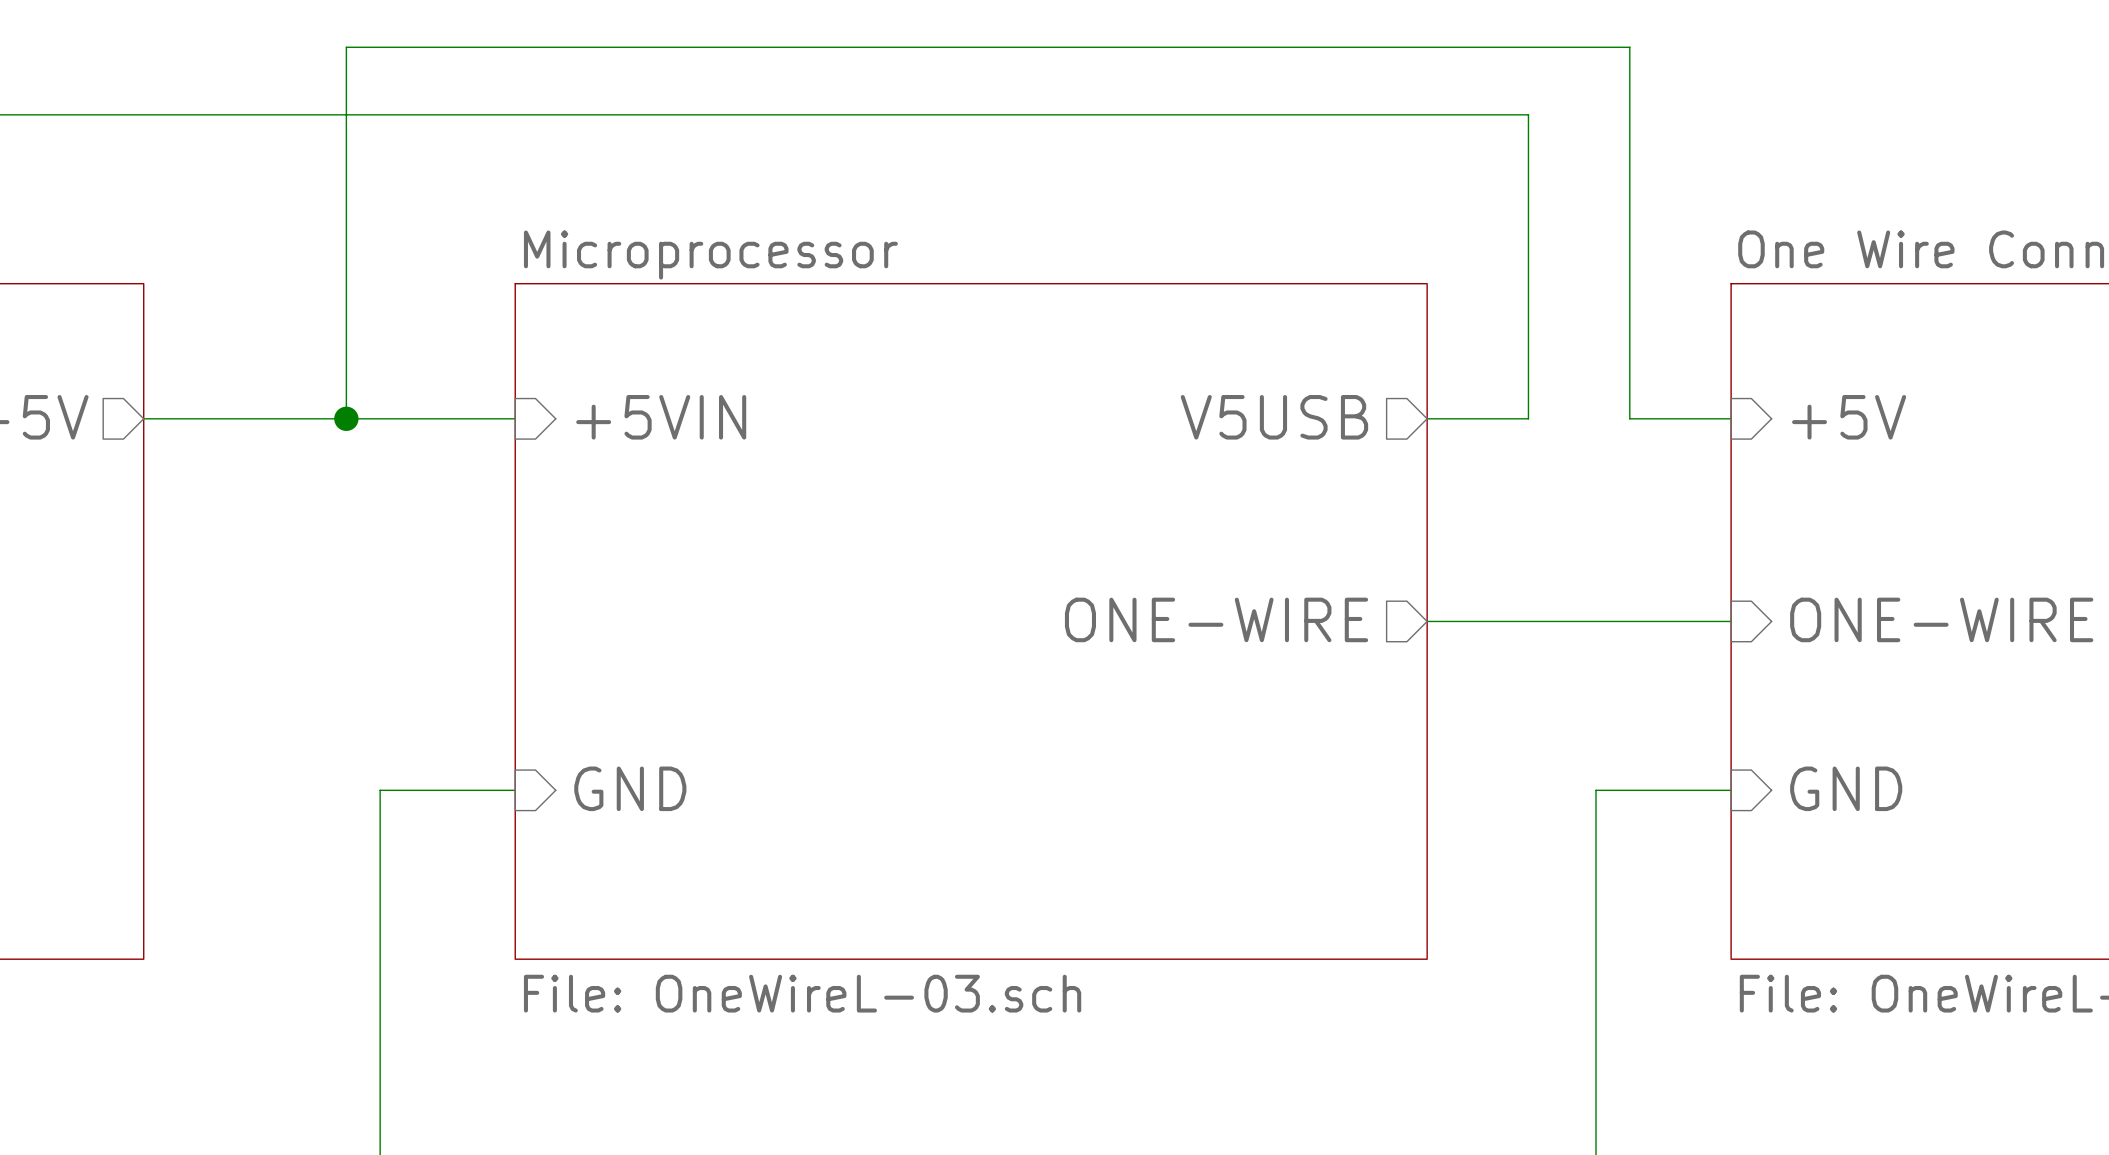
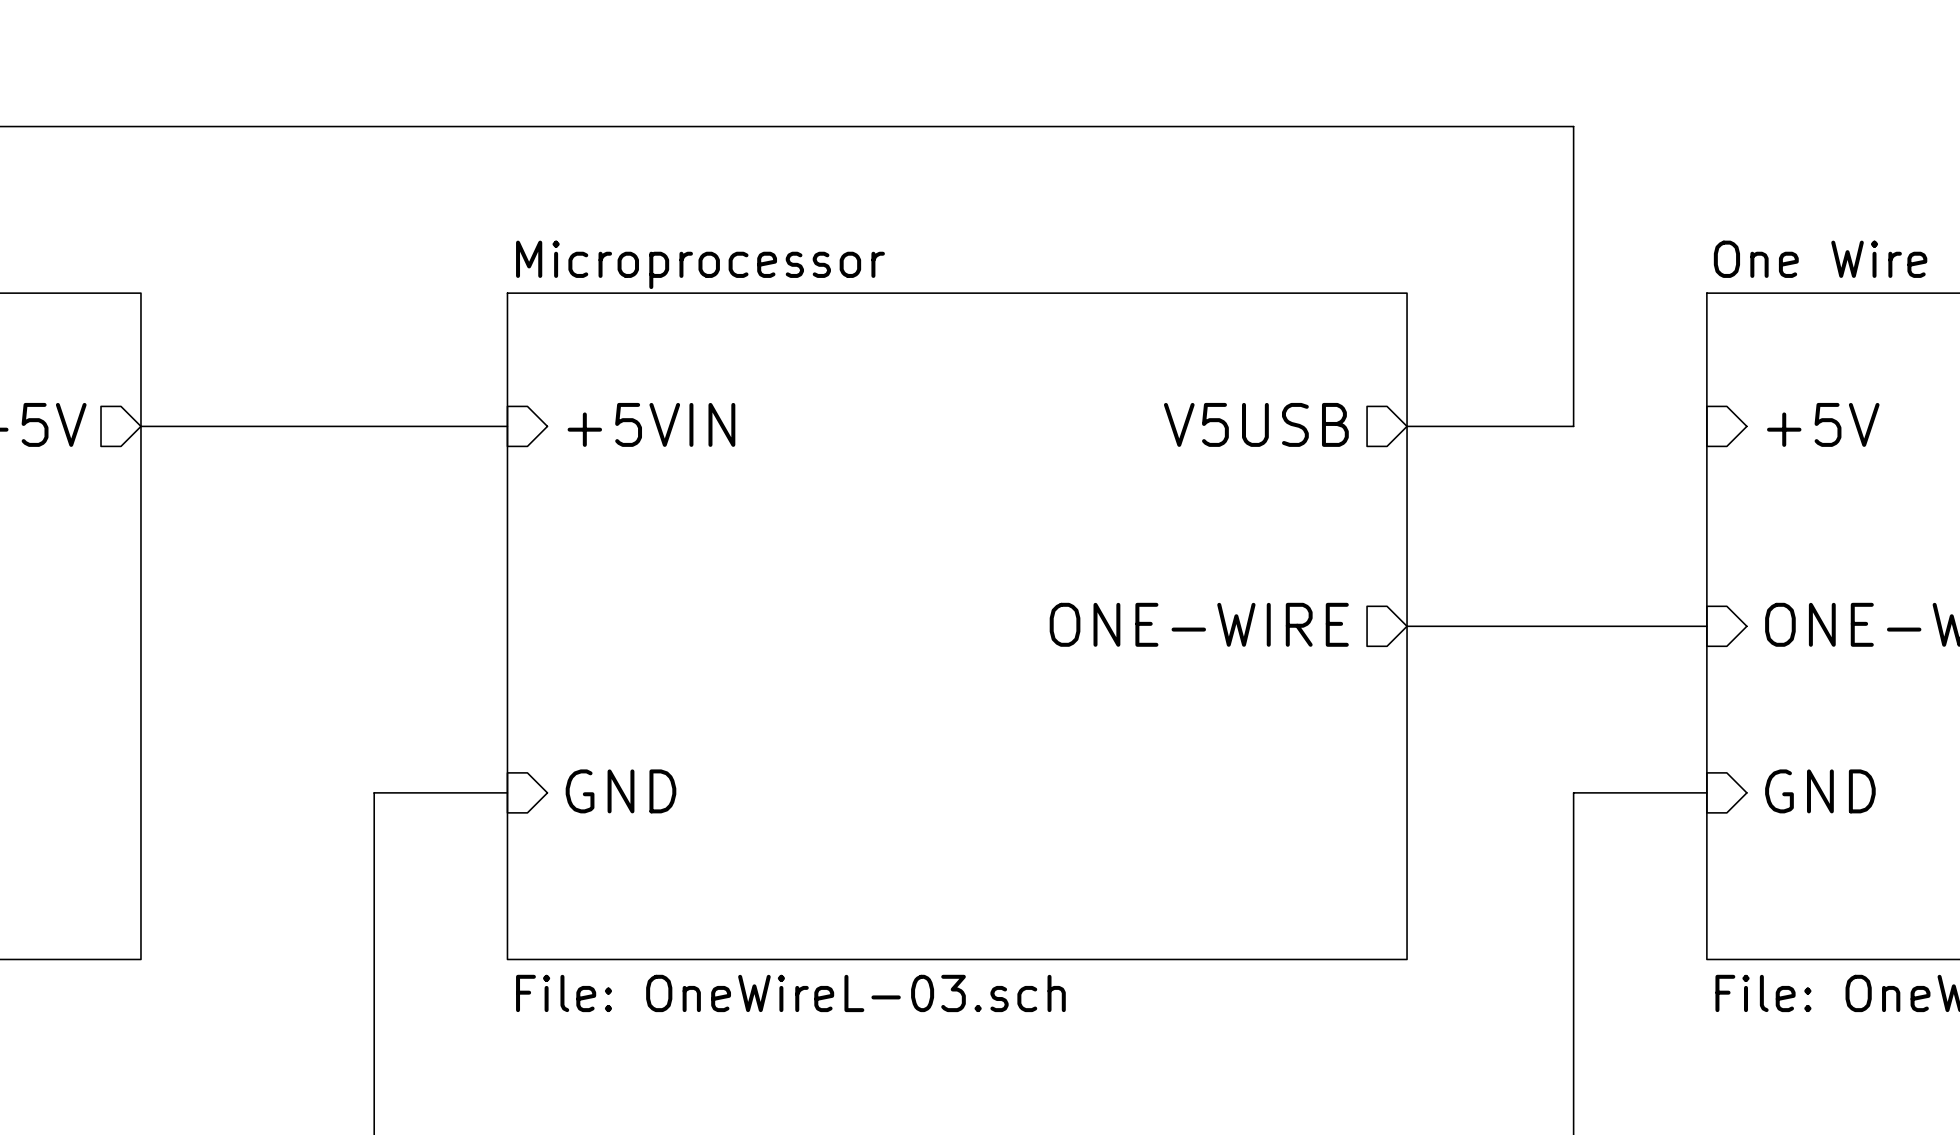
wire: (1528, 114) (1528, 418) -> (1506, 126) (1573, 126) (1573, 426) (1506, 426)
wire: (346, 418) (346, 47) (1629, 47) (1629, 418) (1731, 418) -> none
junction: (346, 418) -> none

